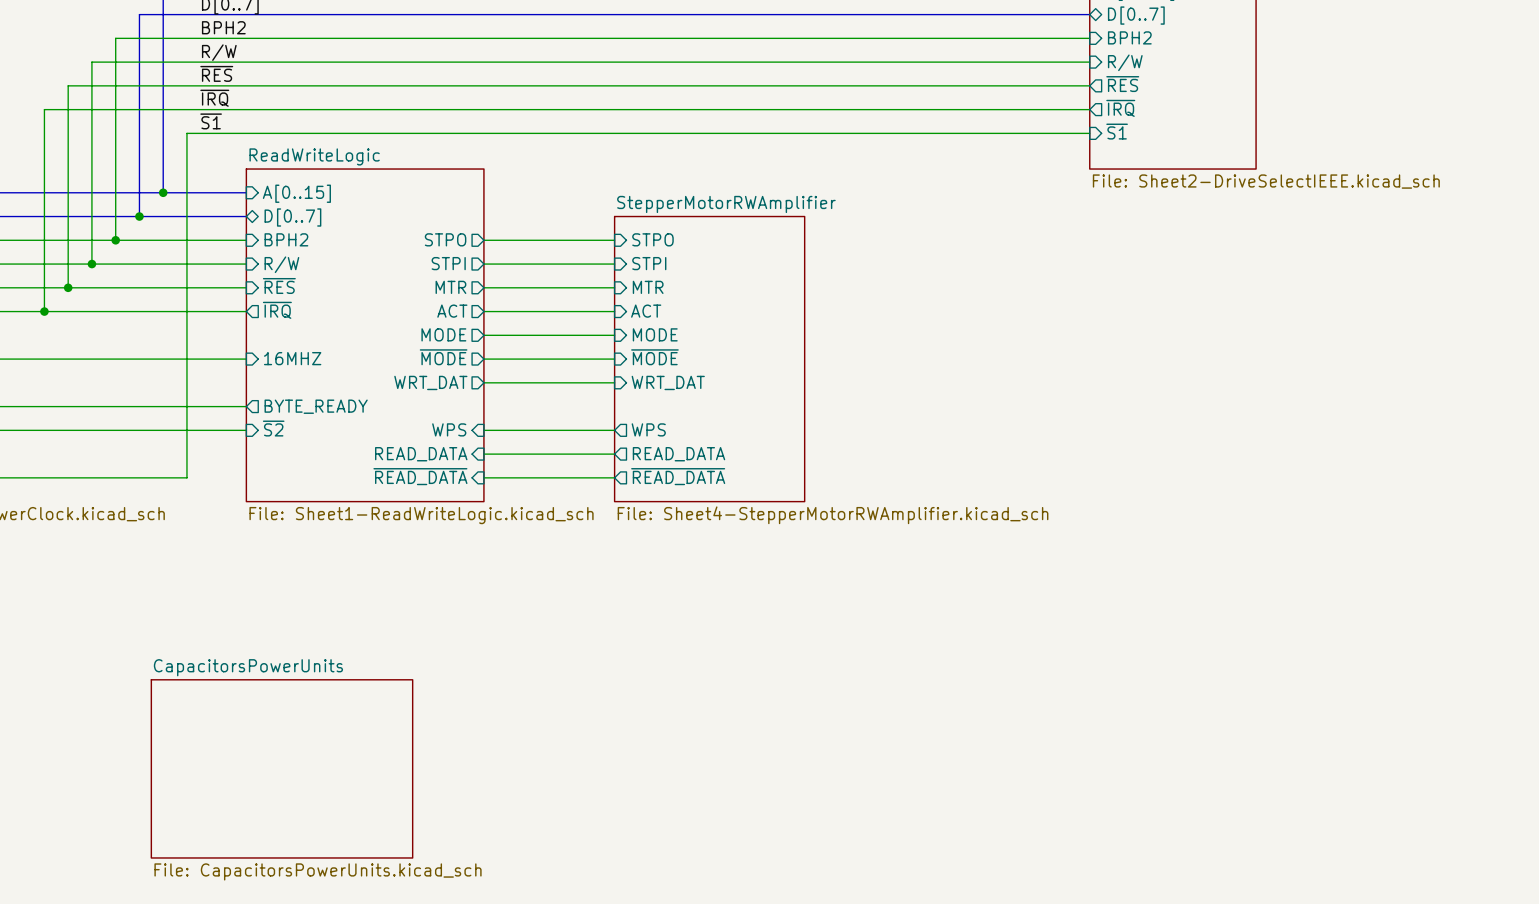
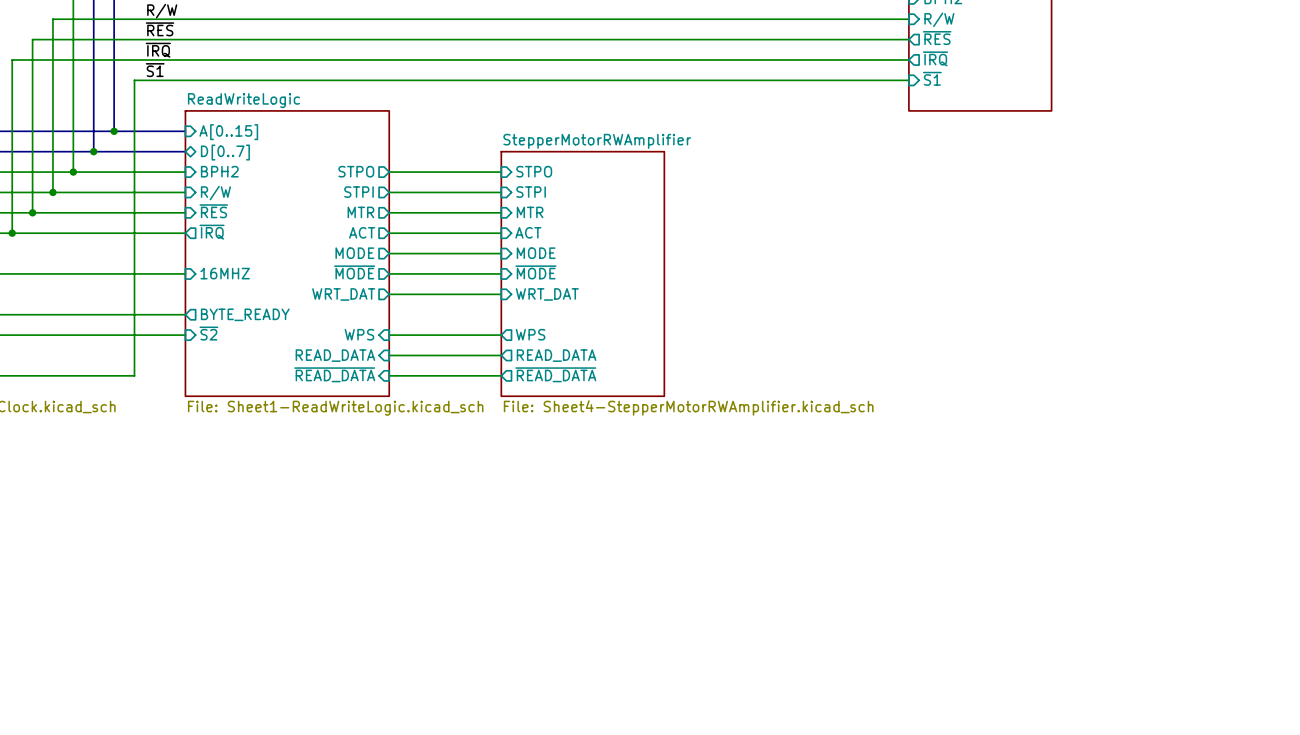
sheet value: File: Sheet2-DriveSelectIEEE.kicad_sch (1266, 181) -> none
sheet CapacitorsPowerUnits: File: CapacitorsPowerUnits.kicad_sch (282, 768) -> none

